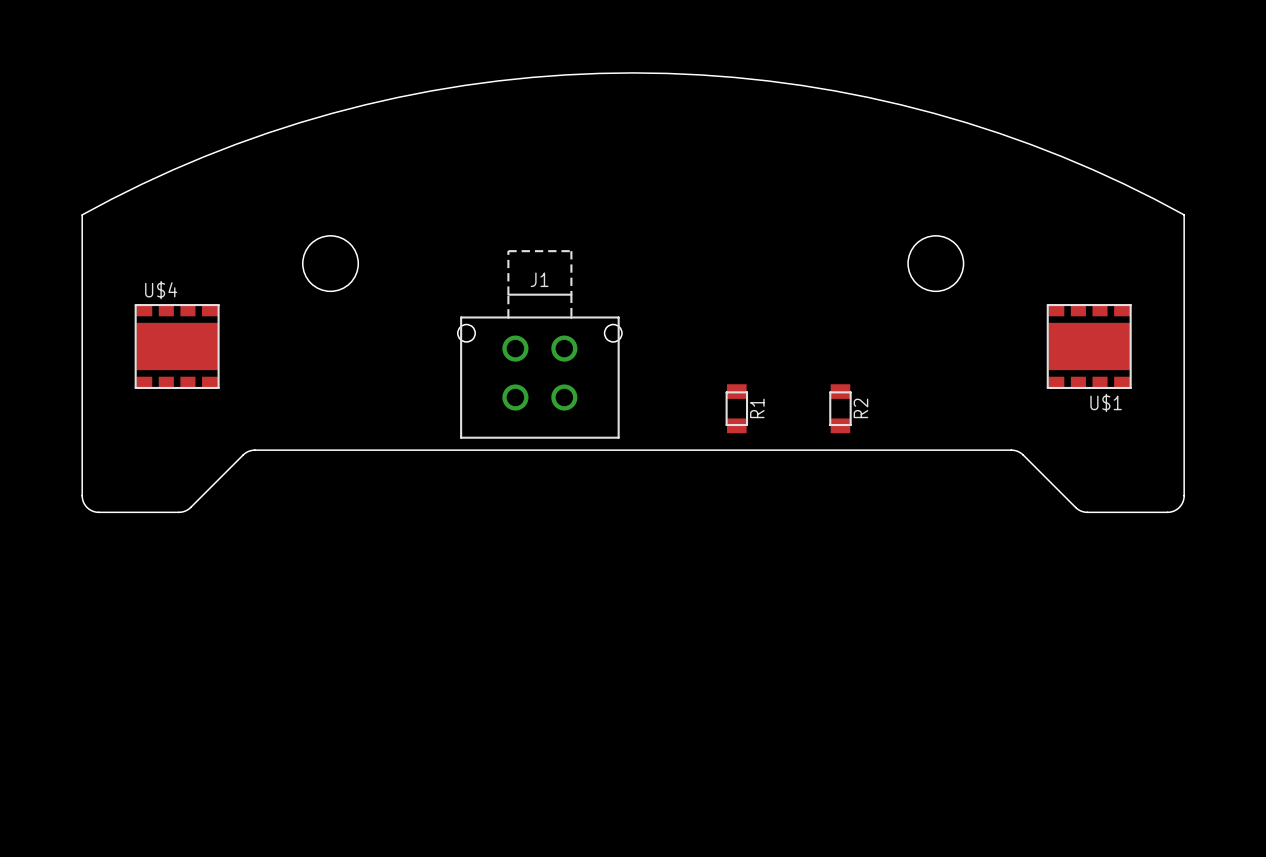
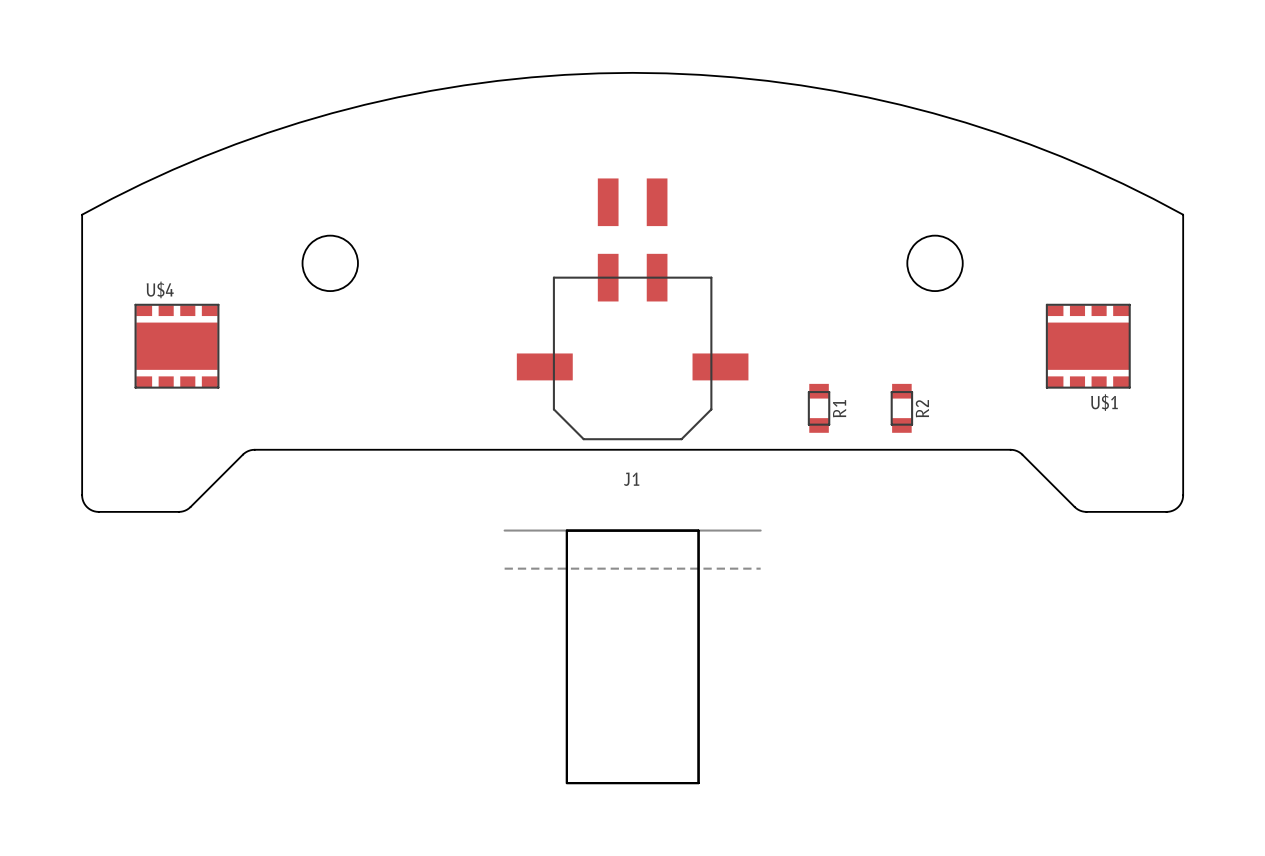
J1 footprint: [457, 250, 622, 439] -> [503, 178, 762, 784]
J1 name position: J1 (539, 279) -> J1 (631, 479)
R1 position: (736, 408) -> (819, 408)
R2 position: (840, 408) -> (901, 408)

